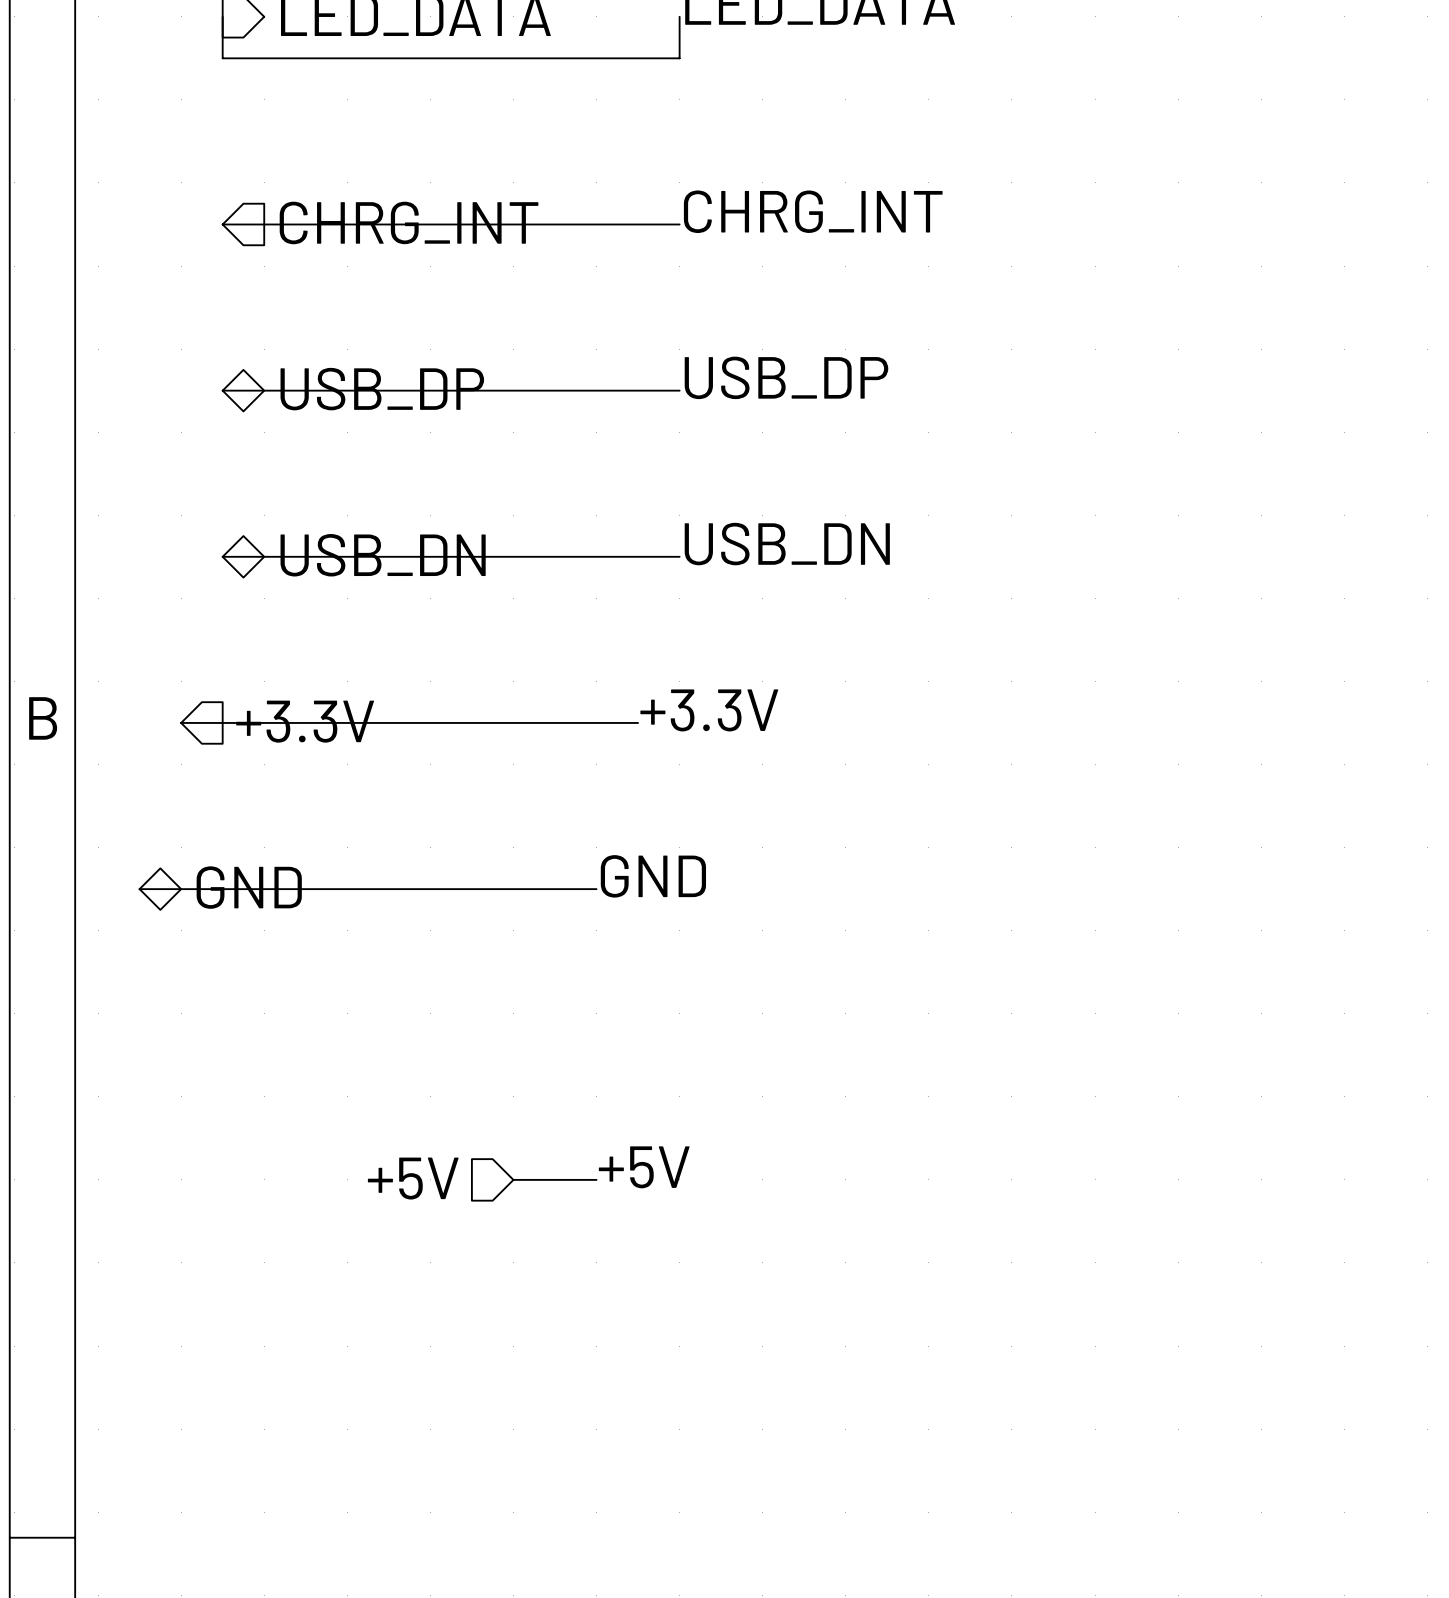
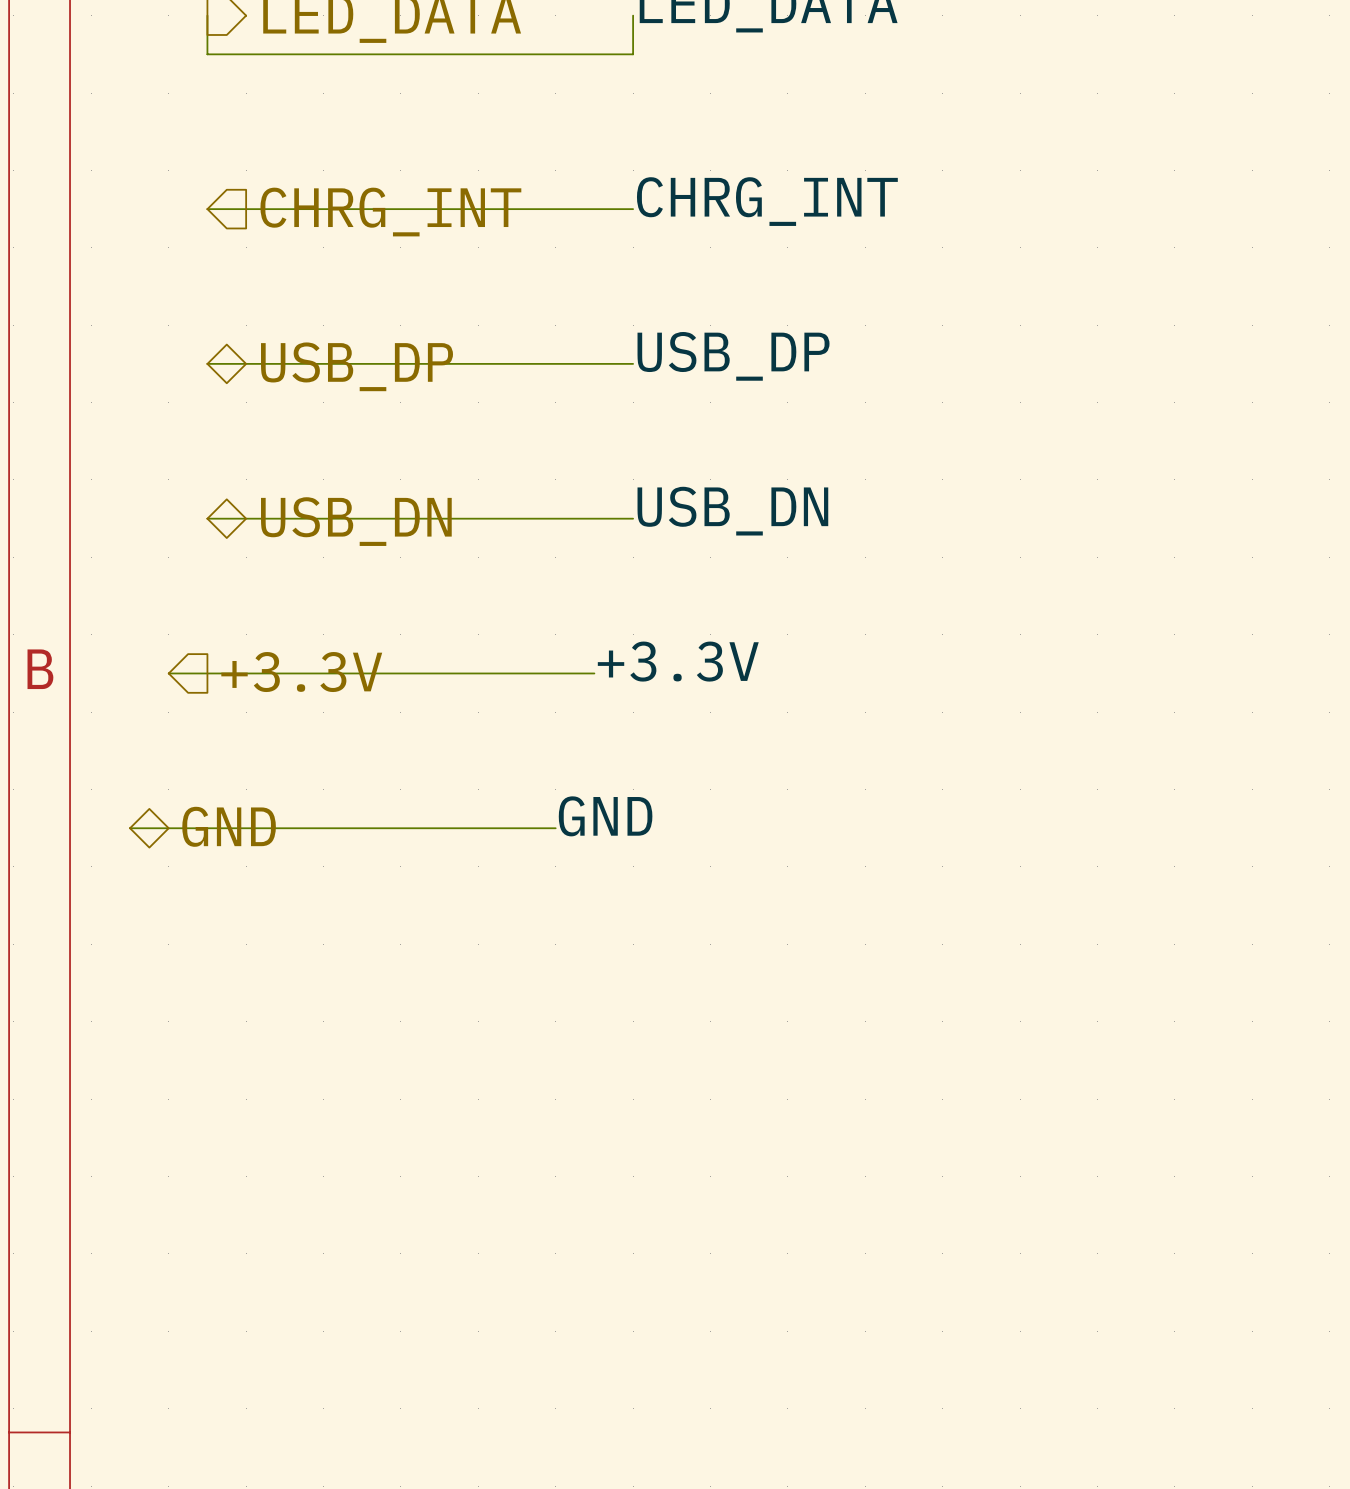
label: +5V (644, 1167) -> none
hierarchical label: +5V (413, 1178) -> none
wire: (513, 1179) (596, 1179) -> none

